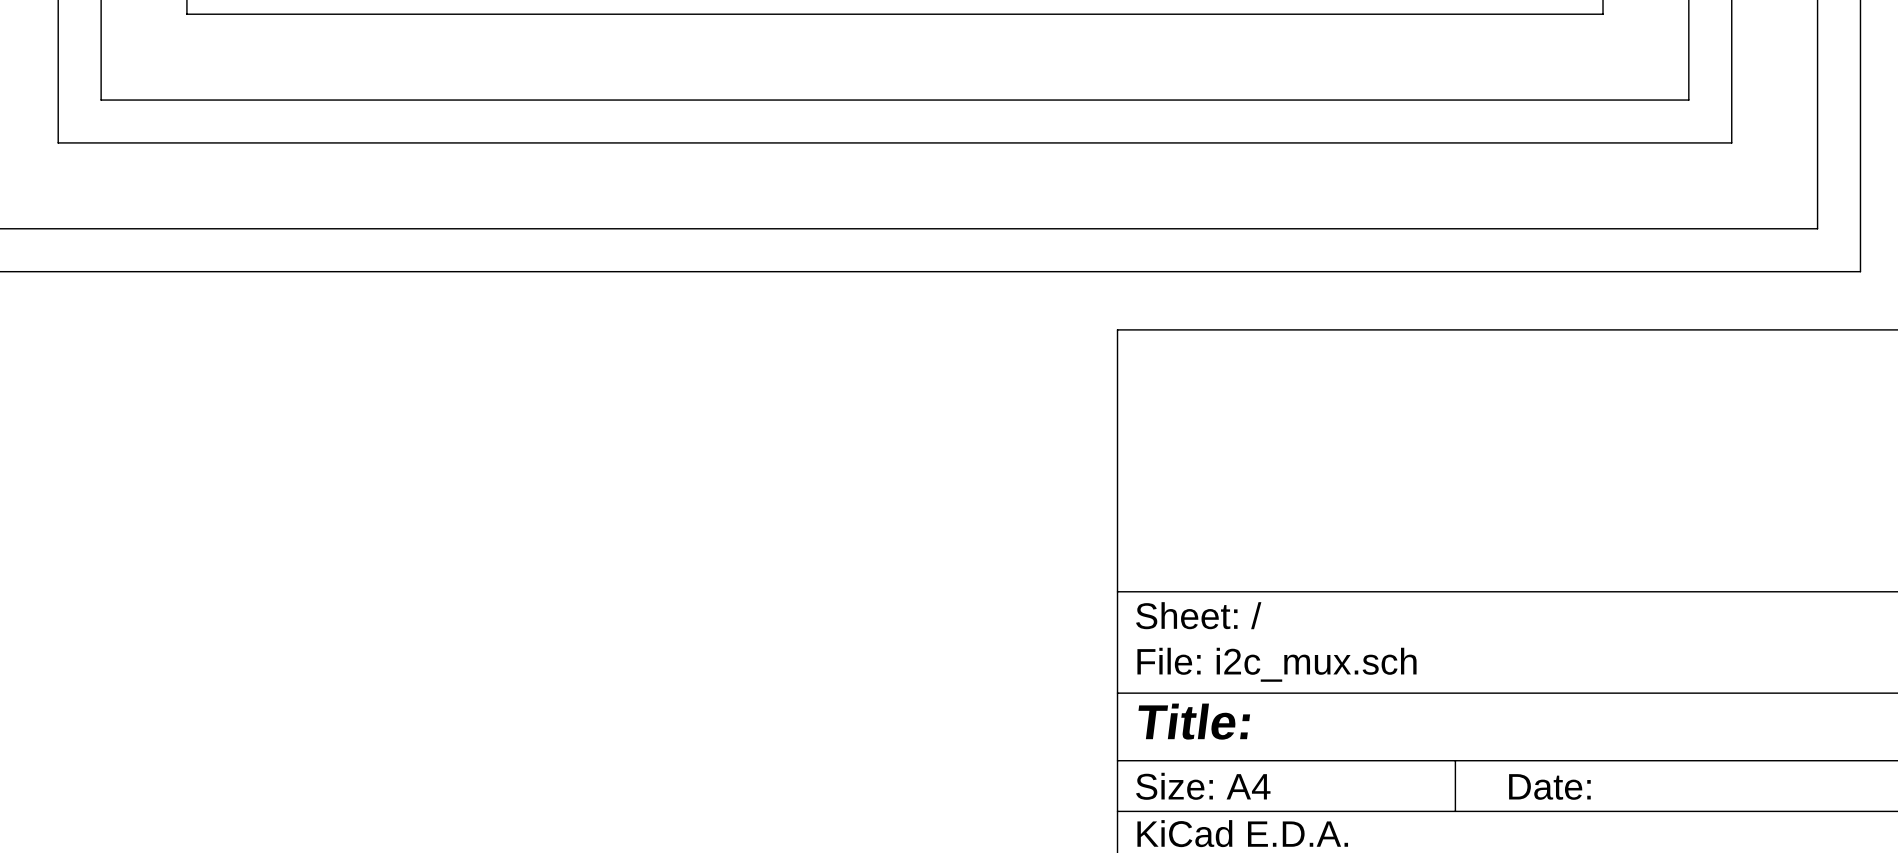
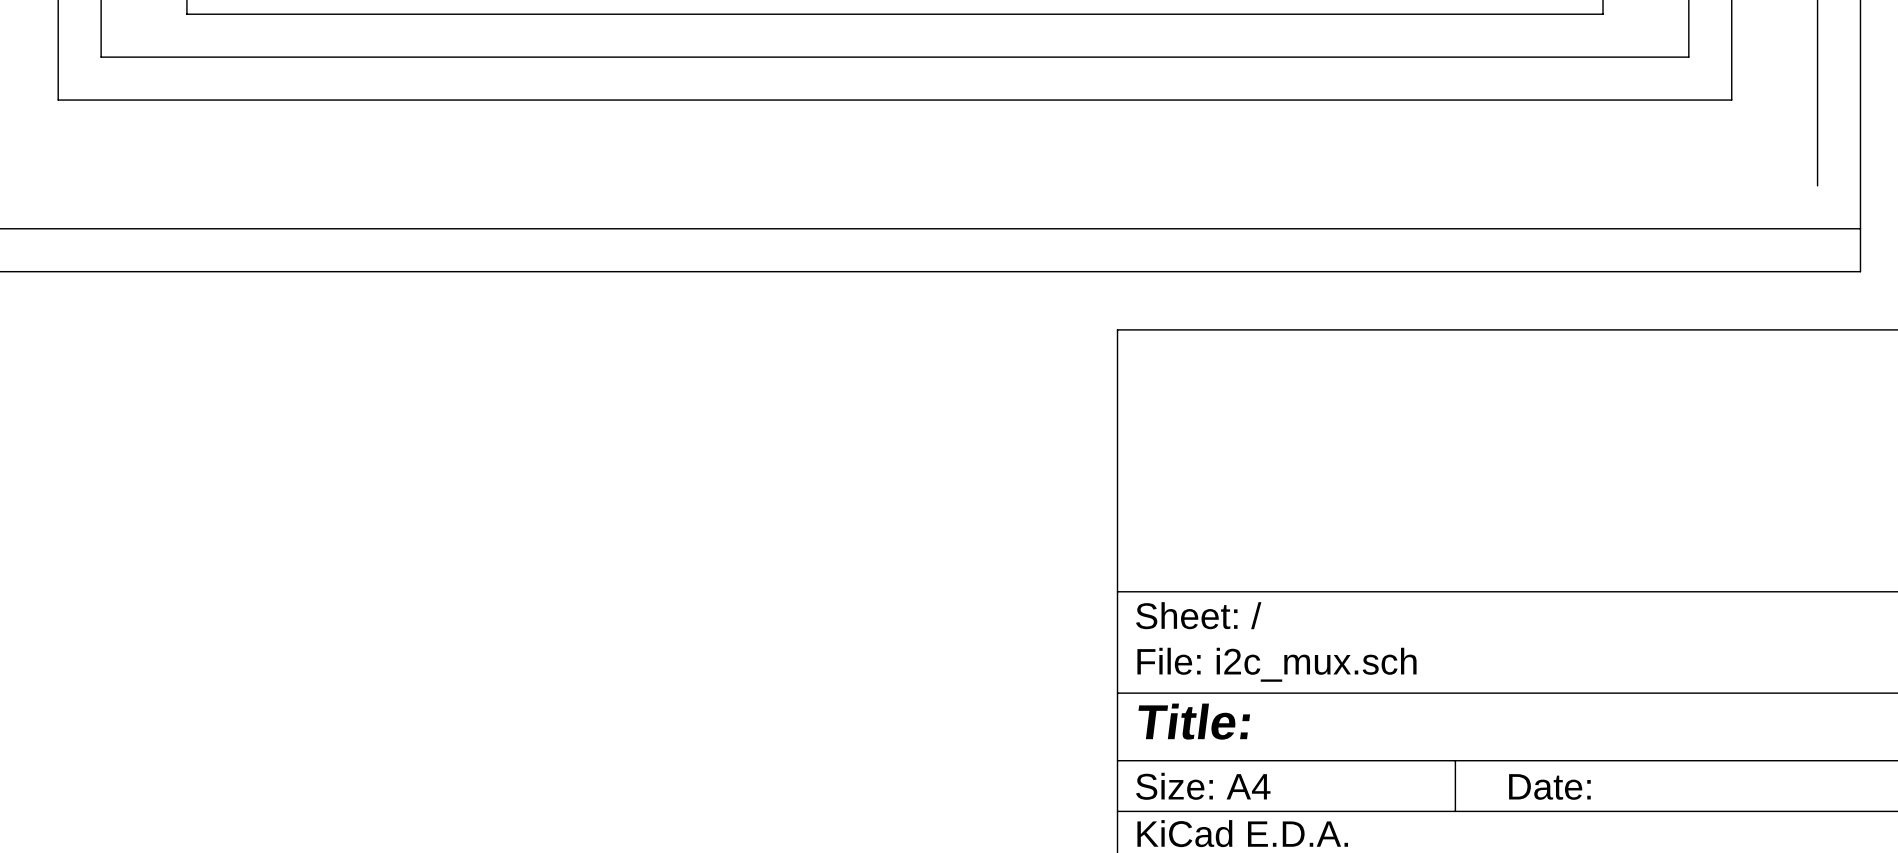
wire: (101, 57) (101, 100) -> (58, 100) (101, 100)
wire: none -> (101, 57) (1688, 57)
wire: (1688, 57) (1688, 100) -> (1731, 100) (1688, 100)
wire: (58, 100) (58, 142) (1731, 142) (1731, 100) -> none
wire: (1817, 185) (1817, 228) -> (1860, 228) (1817, 228)

